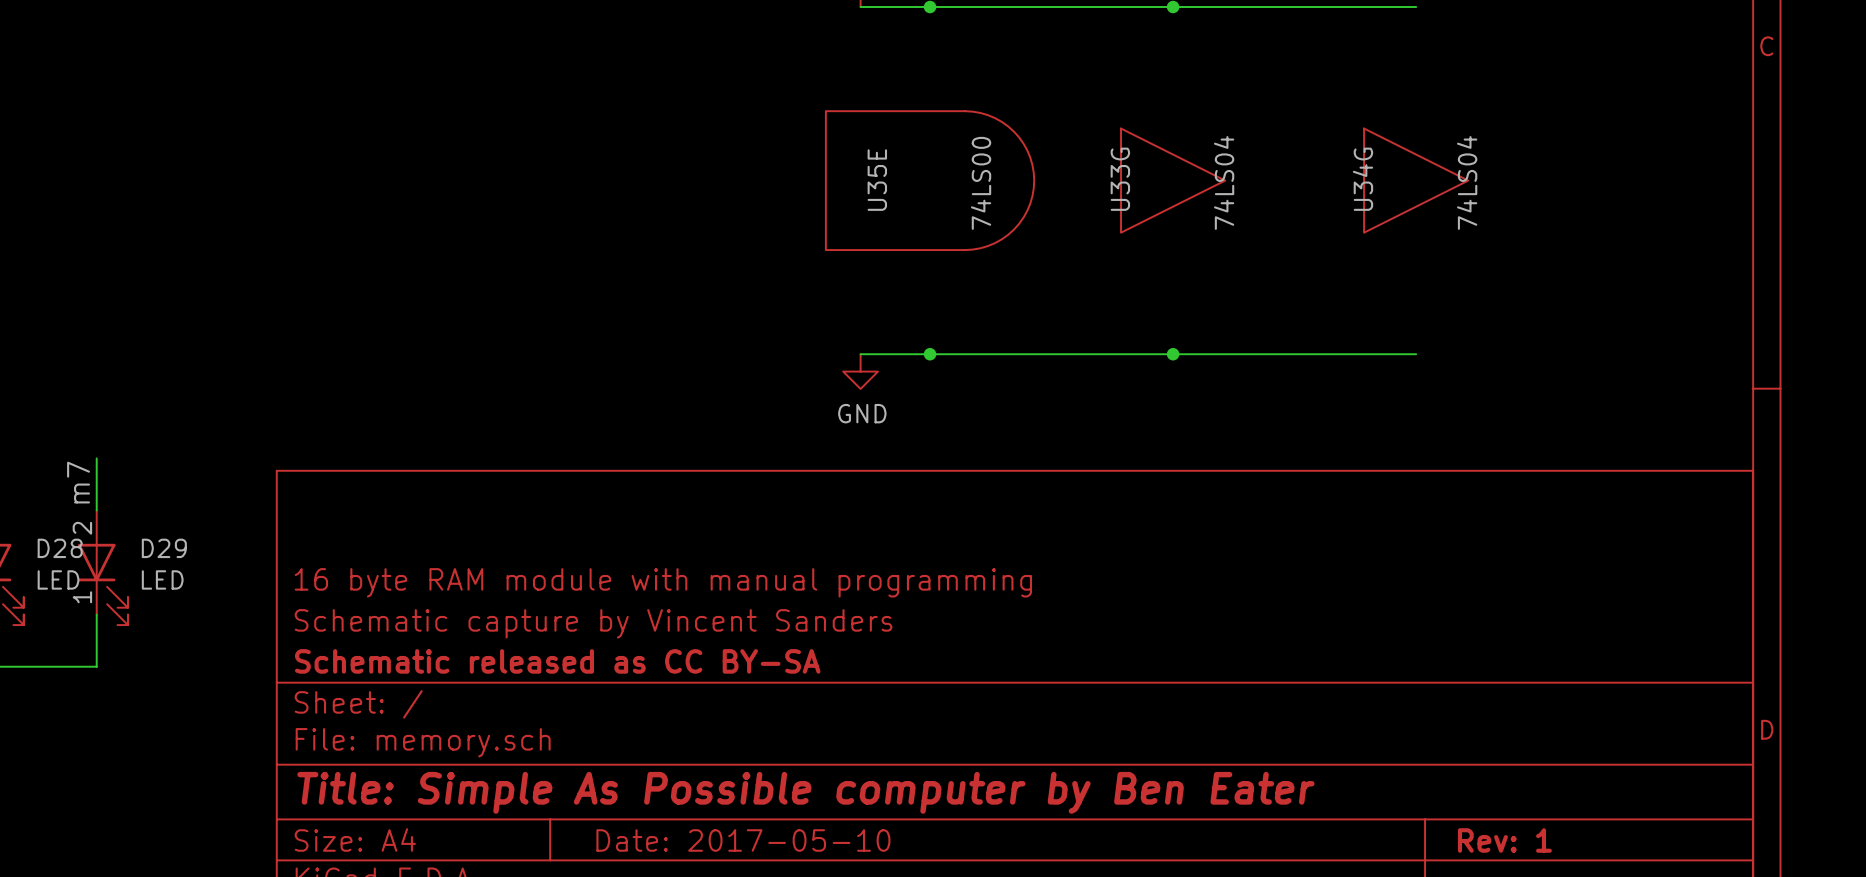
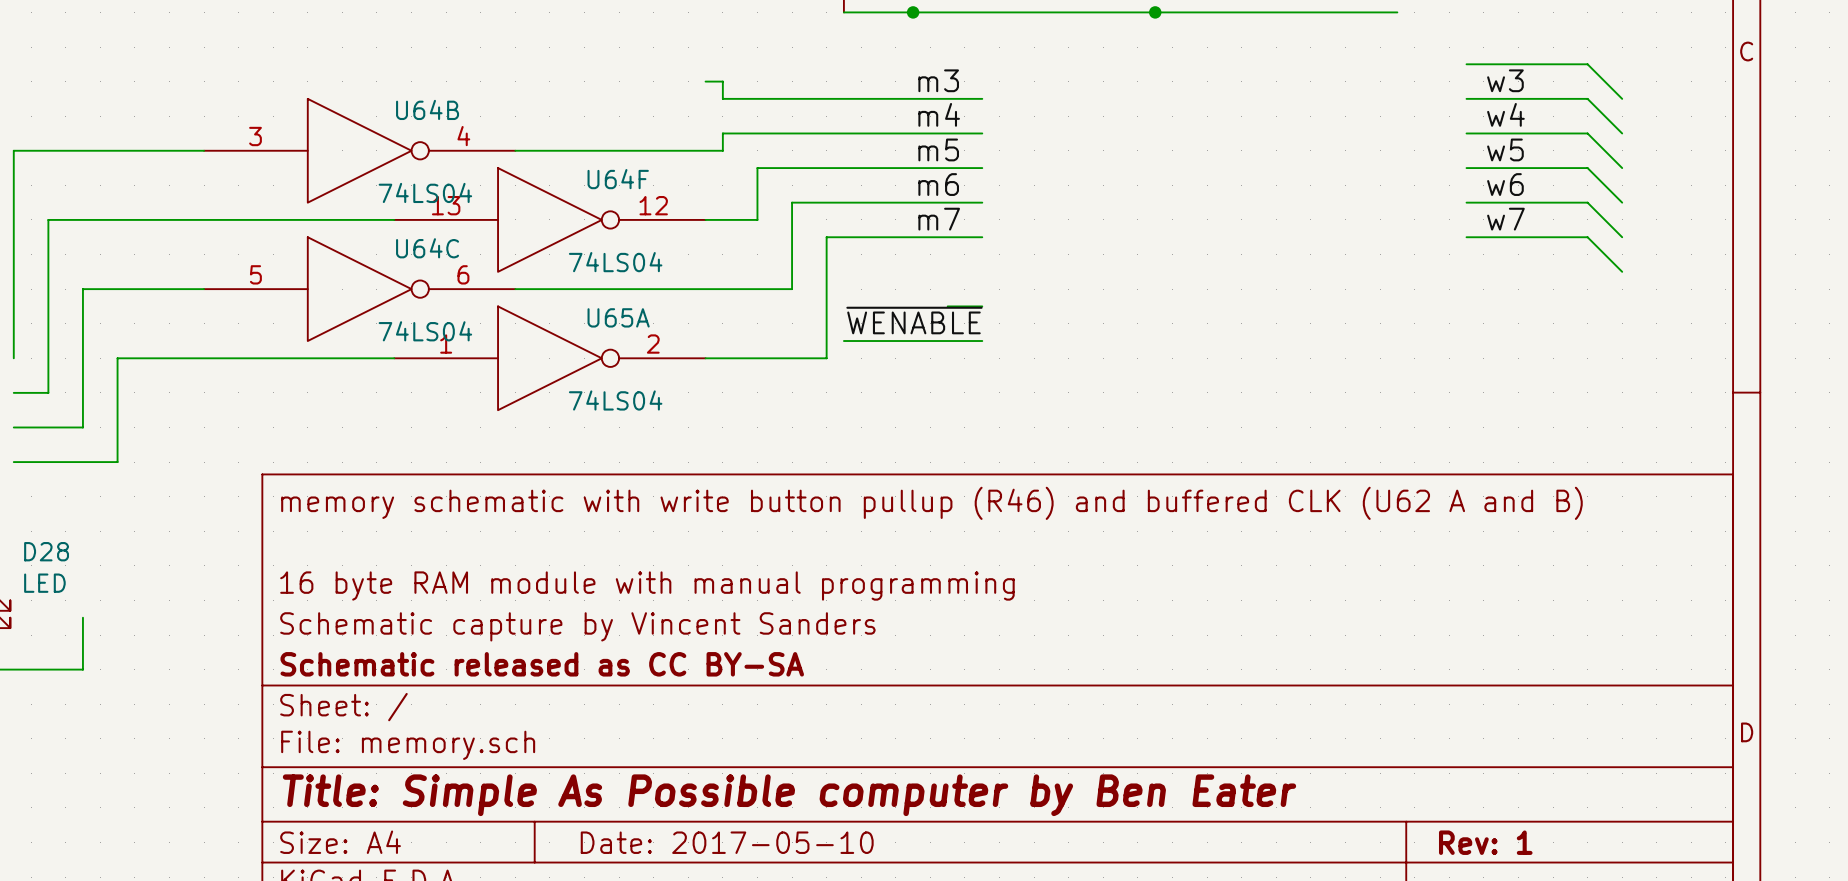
wire: none -> (1466, 64) (1587, 64) (1622, 98)
label: none -> m3 (938, 80)
label: none -> w3 (1505, 80)
wire: none -> (705, 81) (722, 81) (722, 98) (982, 98)
wire: none -> (1466, 98) (1587, 98) (1622, 133)
label: none -> m4 (939, 114)
label: none -> w4 (1505, 114)
wire: none -> (982, 133) (722, 133) (722, 150) (515, 150)
wire: none -> (1466, 133) (1587, 133) (1622, 168)
wire: none -> (204, 150) (13, 150) (13, 358)
U64B: none -> 74LS04 (359, 150)
label: none -> m5 (938, 149)
label: none -> w5 (1505, 149)
wire: none -> (982, 168) (757, 168) (757, 219) (705, 219)
wire: none -> (1466, 168) (1587, 168) (1622, 202)
label: none -> m6 (938, 184)
label: none -> w6 (1505, 184)
U35E: 74LS00 (930, 180) -> none
U33G: 74LS04 (1173, 180) -> none
U34G: 74LS04 (1416, 180) -> none
wire: none -> (982, 202) (792, 202) (792, 289) (515, 289)
wire: none -> (1466, 202) (1587, 202) (1622, 237)
label: none -> m7 (939, 219)
label: none -> w7 (1505, 219)
wire: none -> (394, 219) (48, 219) (48, 392) (13, 392)
U64F: none -> 74LS04 (549, 219)
wire: none -> (982, 237) (826, 237) (826, 358) (705, 358)
wire: none -> (1466, 237) (1587, 237) (1622, 271)
wire: none -> (204, 289) (82, 289) (82, 427) (13, 427)
U64C: none -> 74LS04 (359, 289)
wire: none -> (947, 306) (982, 306)
label: none -> ~{WENABLE} (914, 320)
wire: none -> (843, 341) (982, 341)
wire: none -> (394, 358) (117, 358) (117, 462) (13, 462)
U65A: none -> 74LS04 (549, 358)
wire: (860, 354) (1416, 354) -> none
junction: (930, 354) -> none
junction: (1173, 354) -> none
power symbol: GND (860, 371) -> none
wire: (96, 458) (96, 510) -> none
label: m7 (78, 482) -> none
title block: none -> memory schematic with write button pullup (R46) and buffered CLK (U62 A and B) (931, 503)
D29: LED (102, 567) -> none

